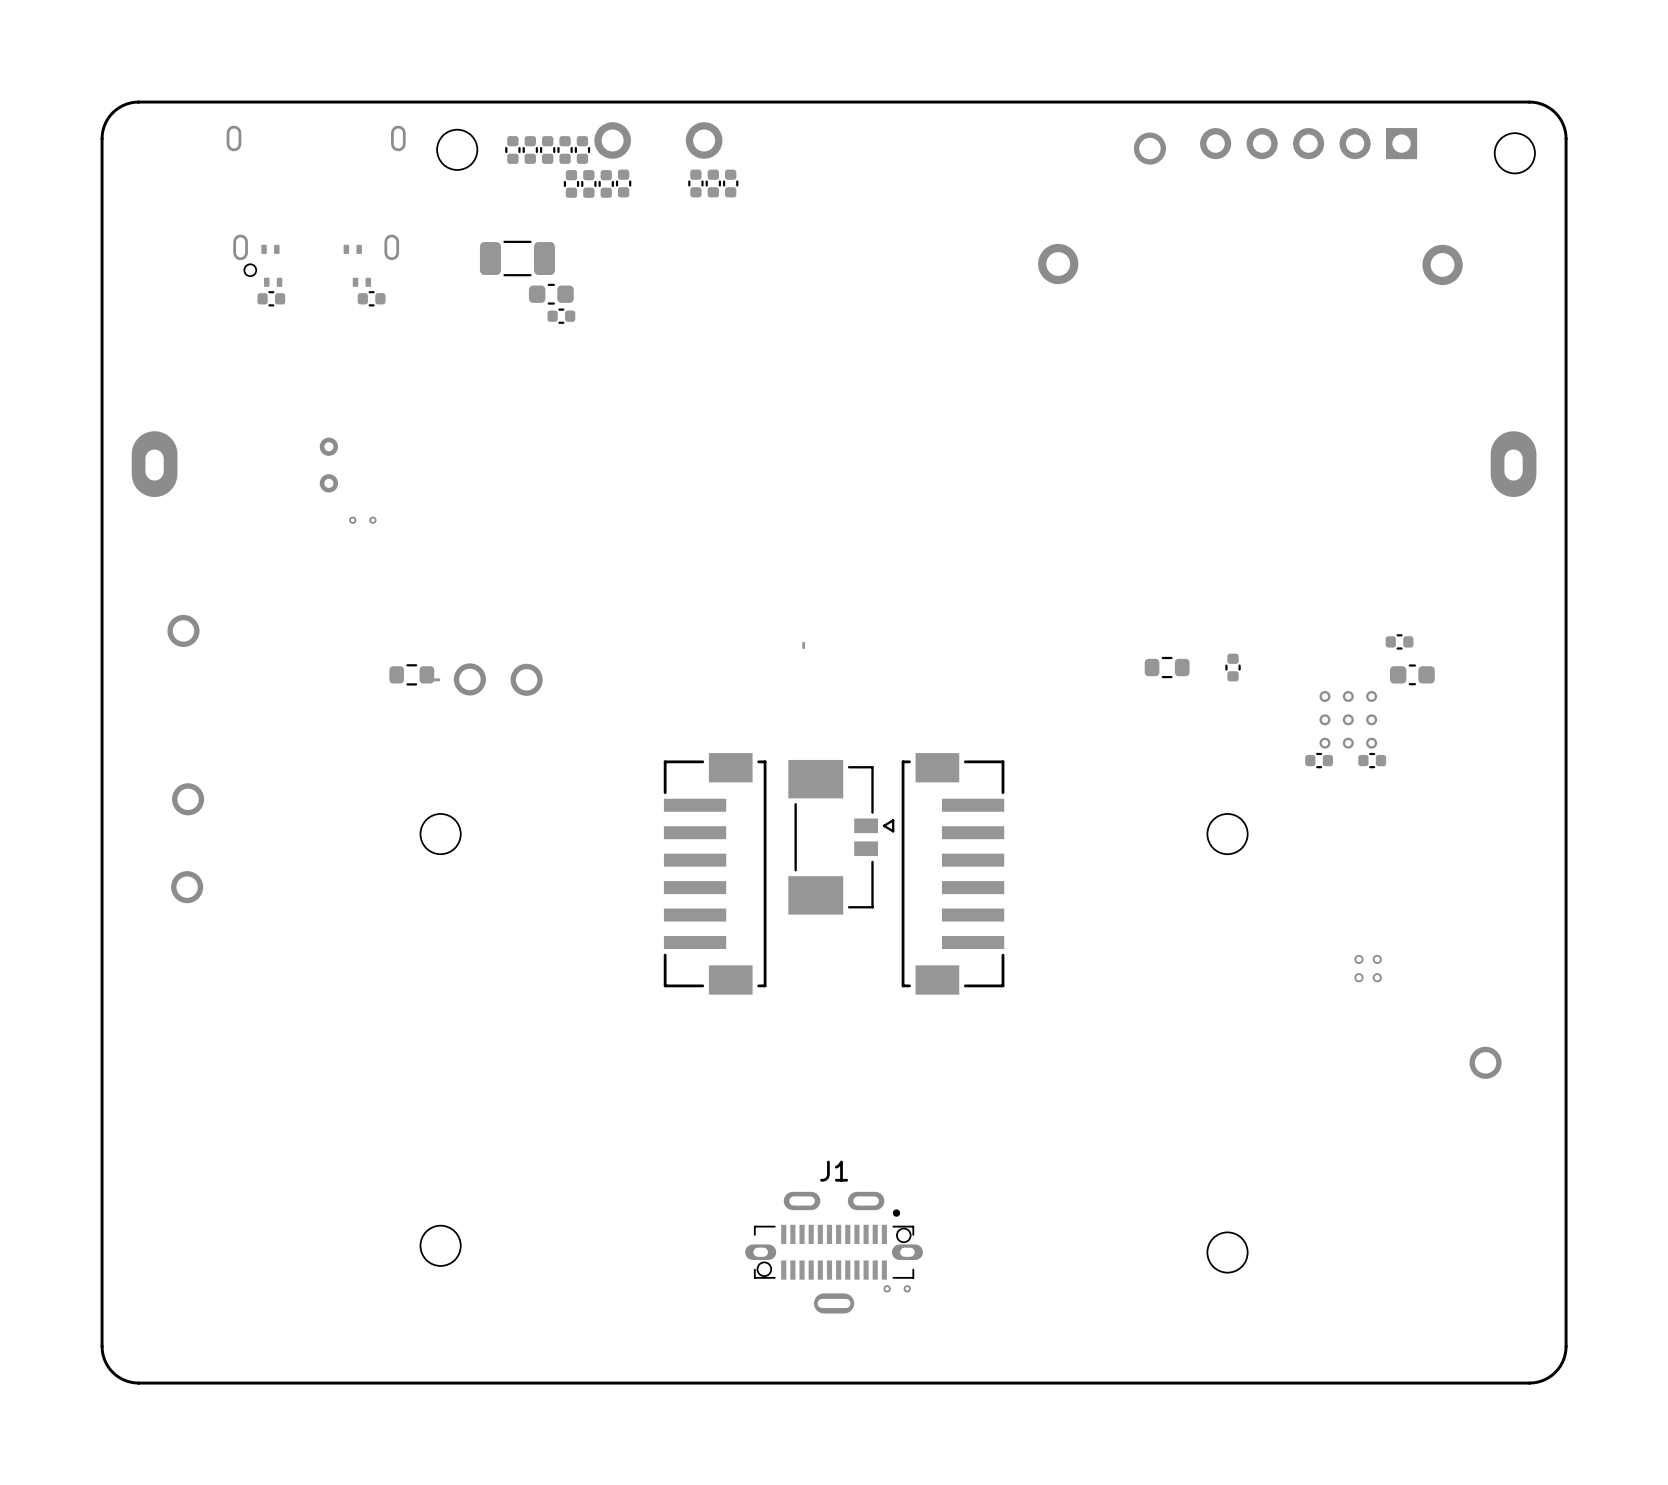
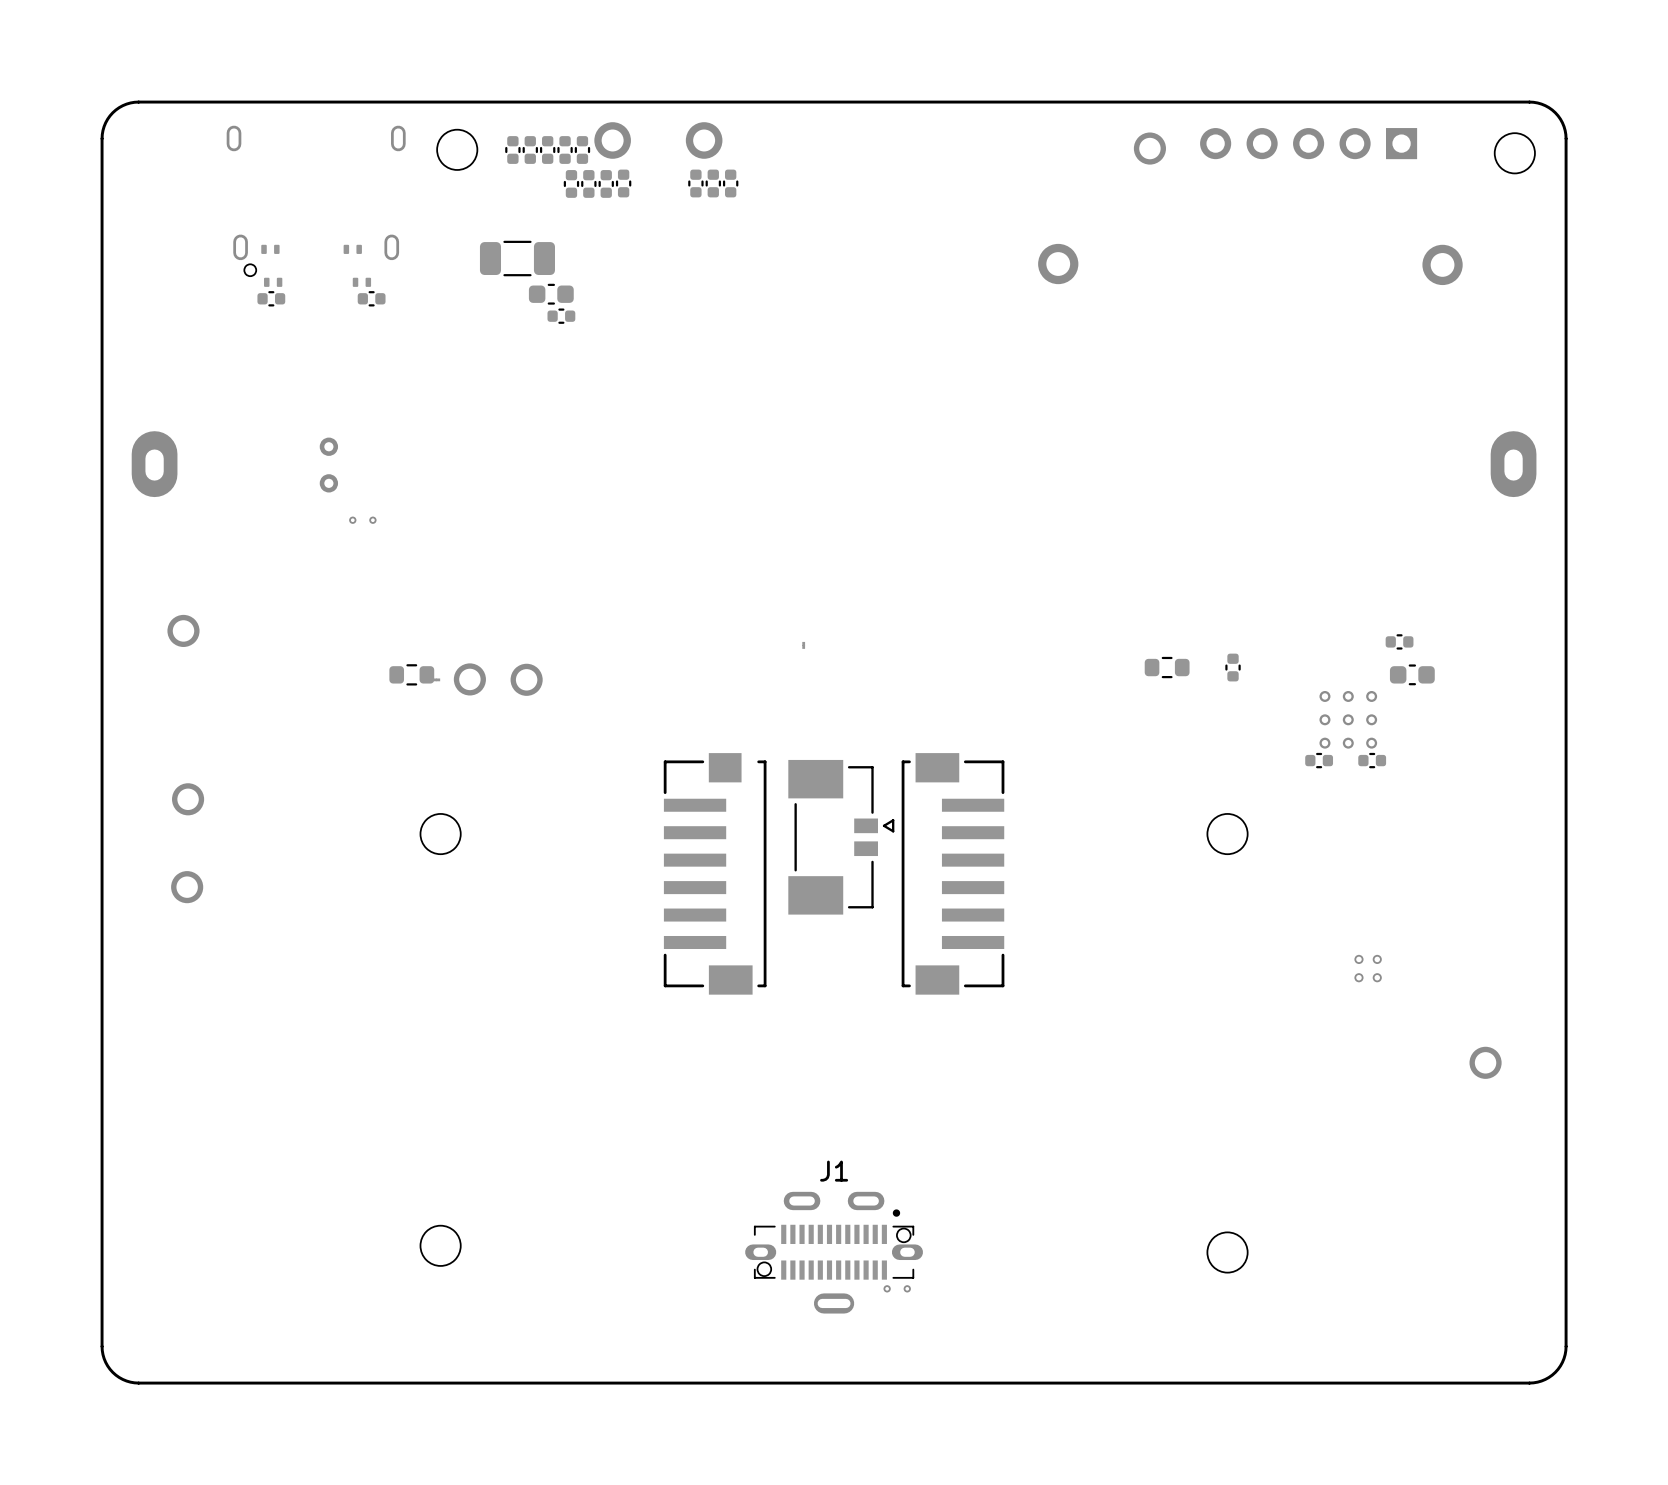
part footprint: [663, 753, 767, 995] -> [663, 753, 767, 995]

